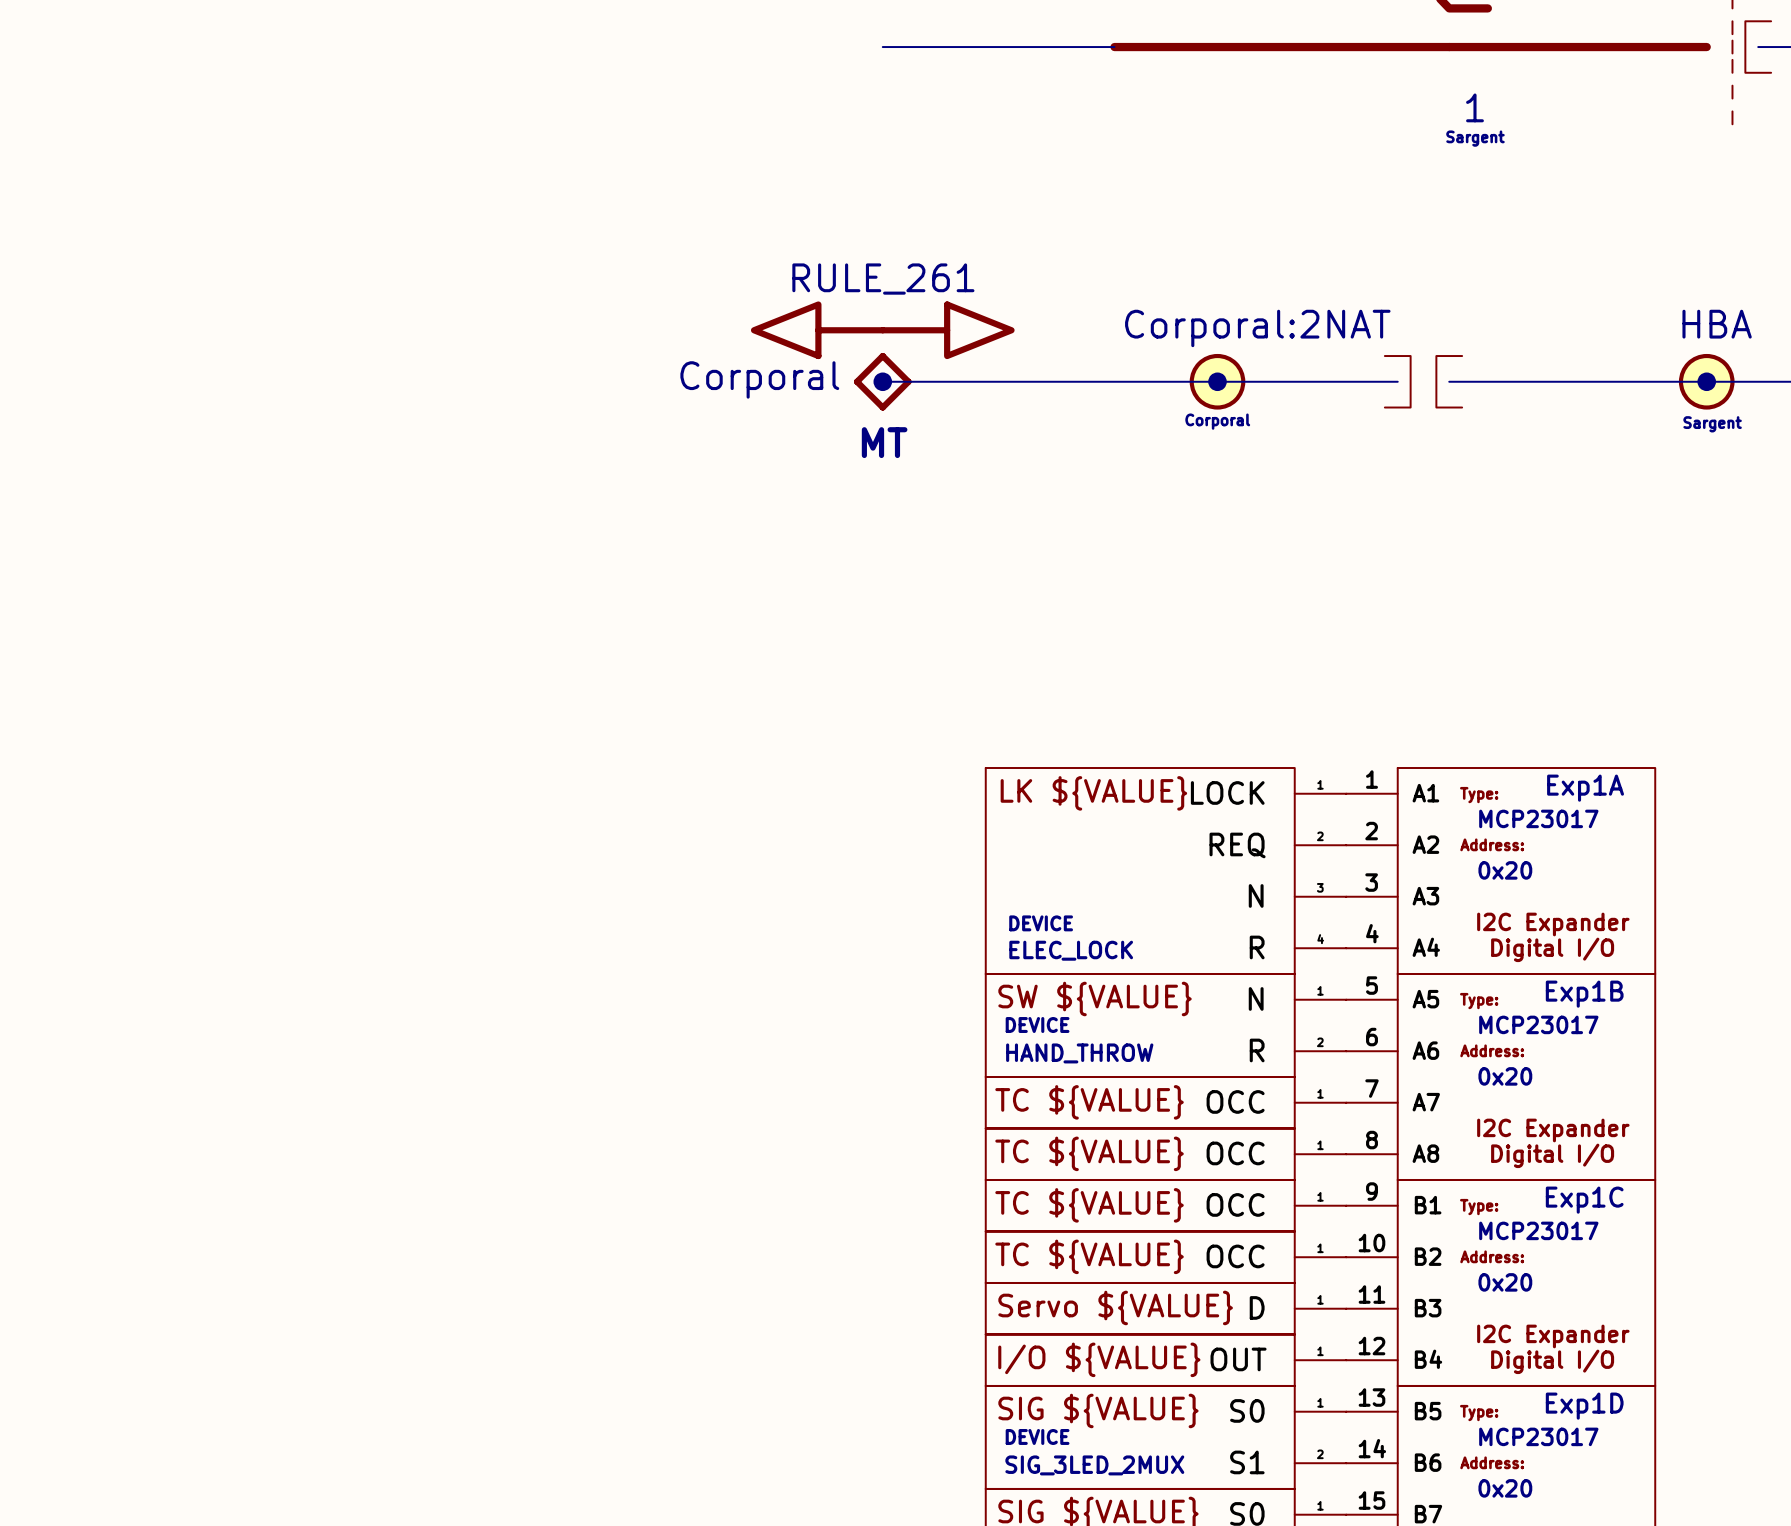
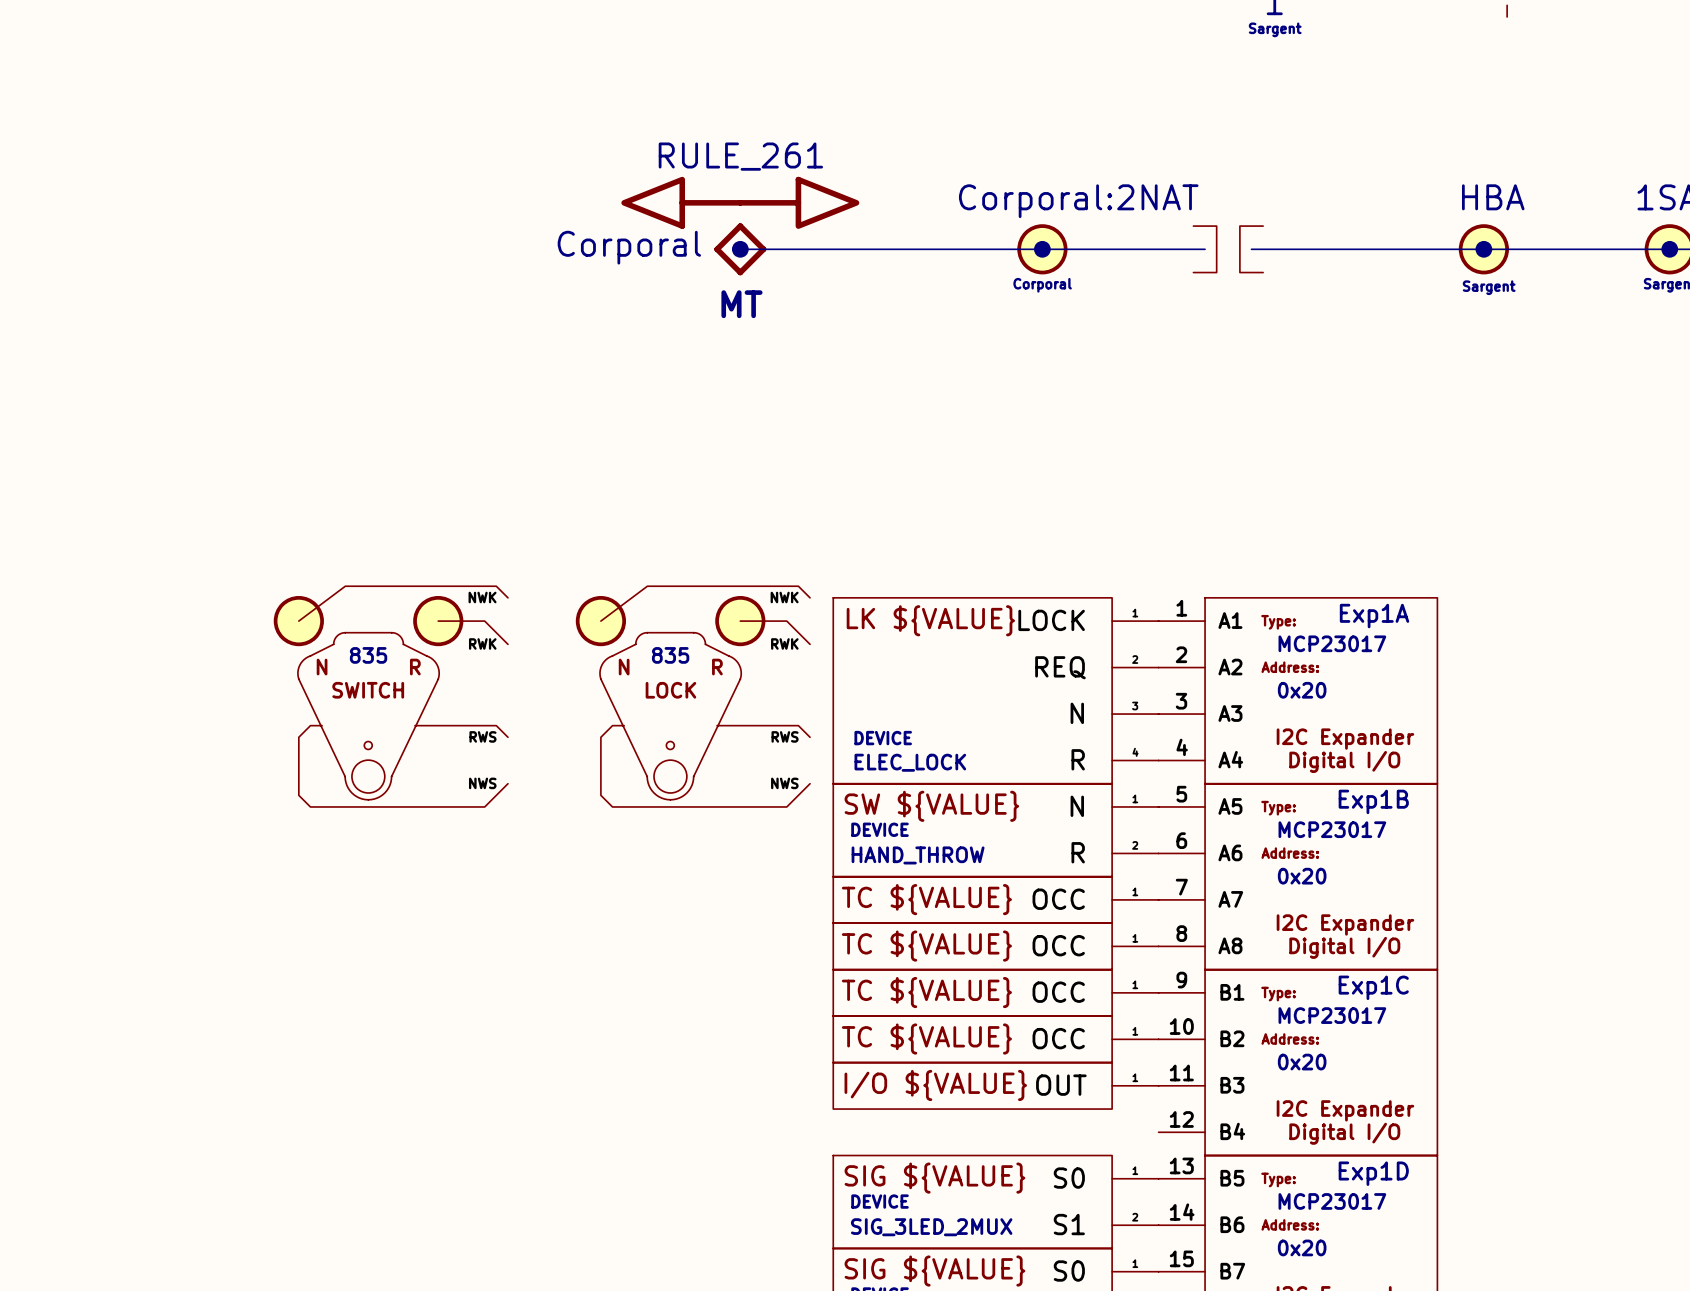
part: none -> 835 (390, 696)
part: none -> 835 (692, 696)
part text: Servo ${VALUE} (1115, 1307) -> none
part pin name: D (1257, 1307) -> OUT (1061, 1085)
part text: none -> I/O ${VALUE} (935, 1085)
part: (1166, 1360) -> none

